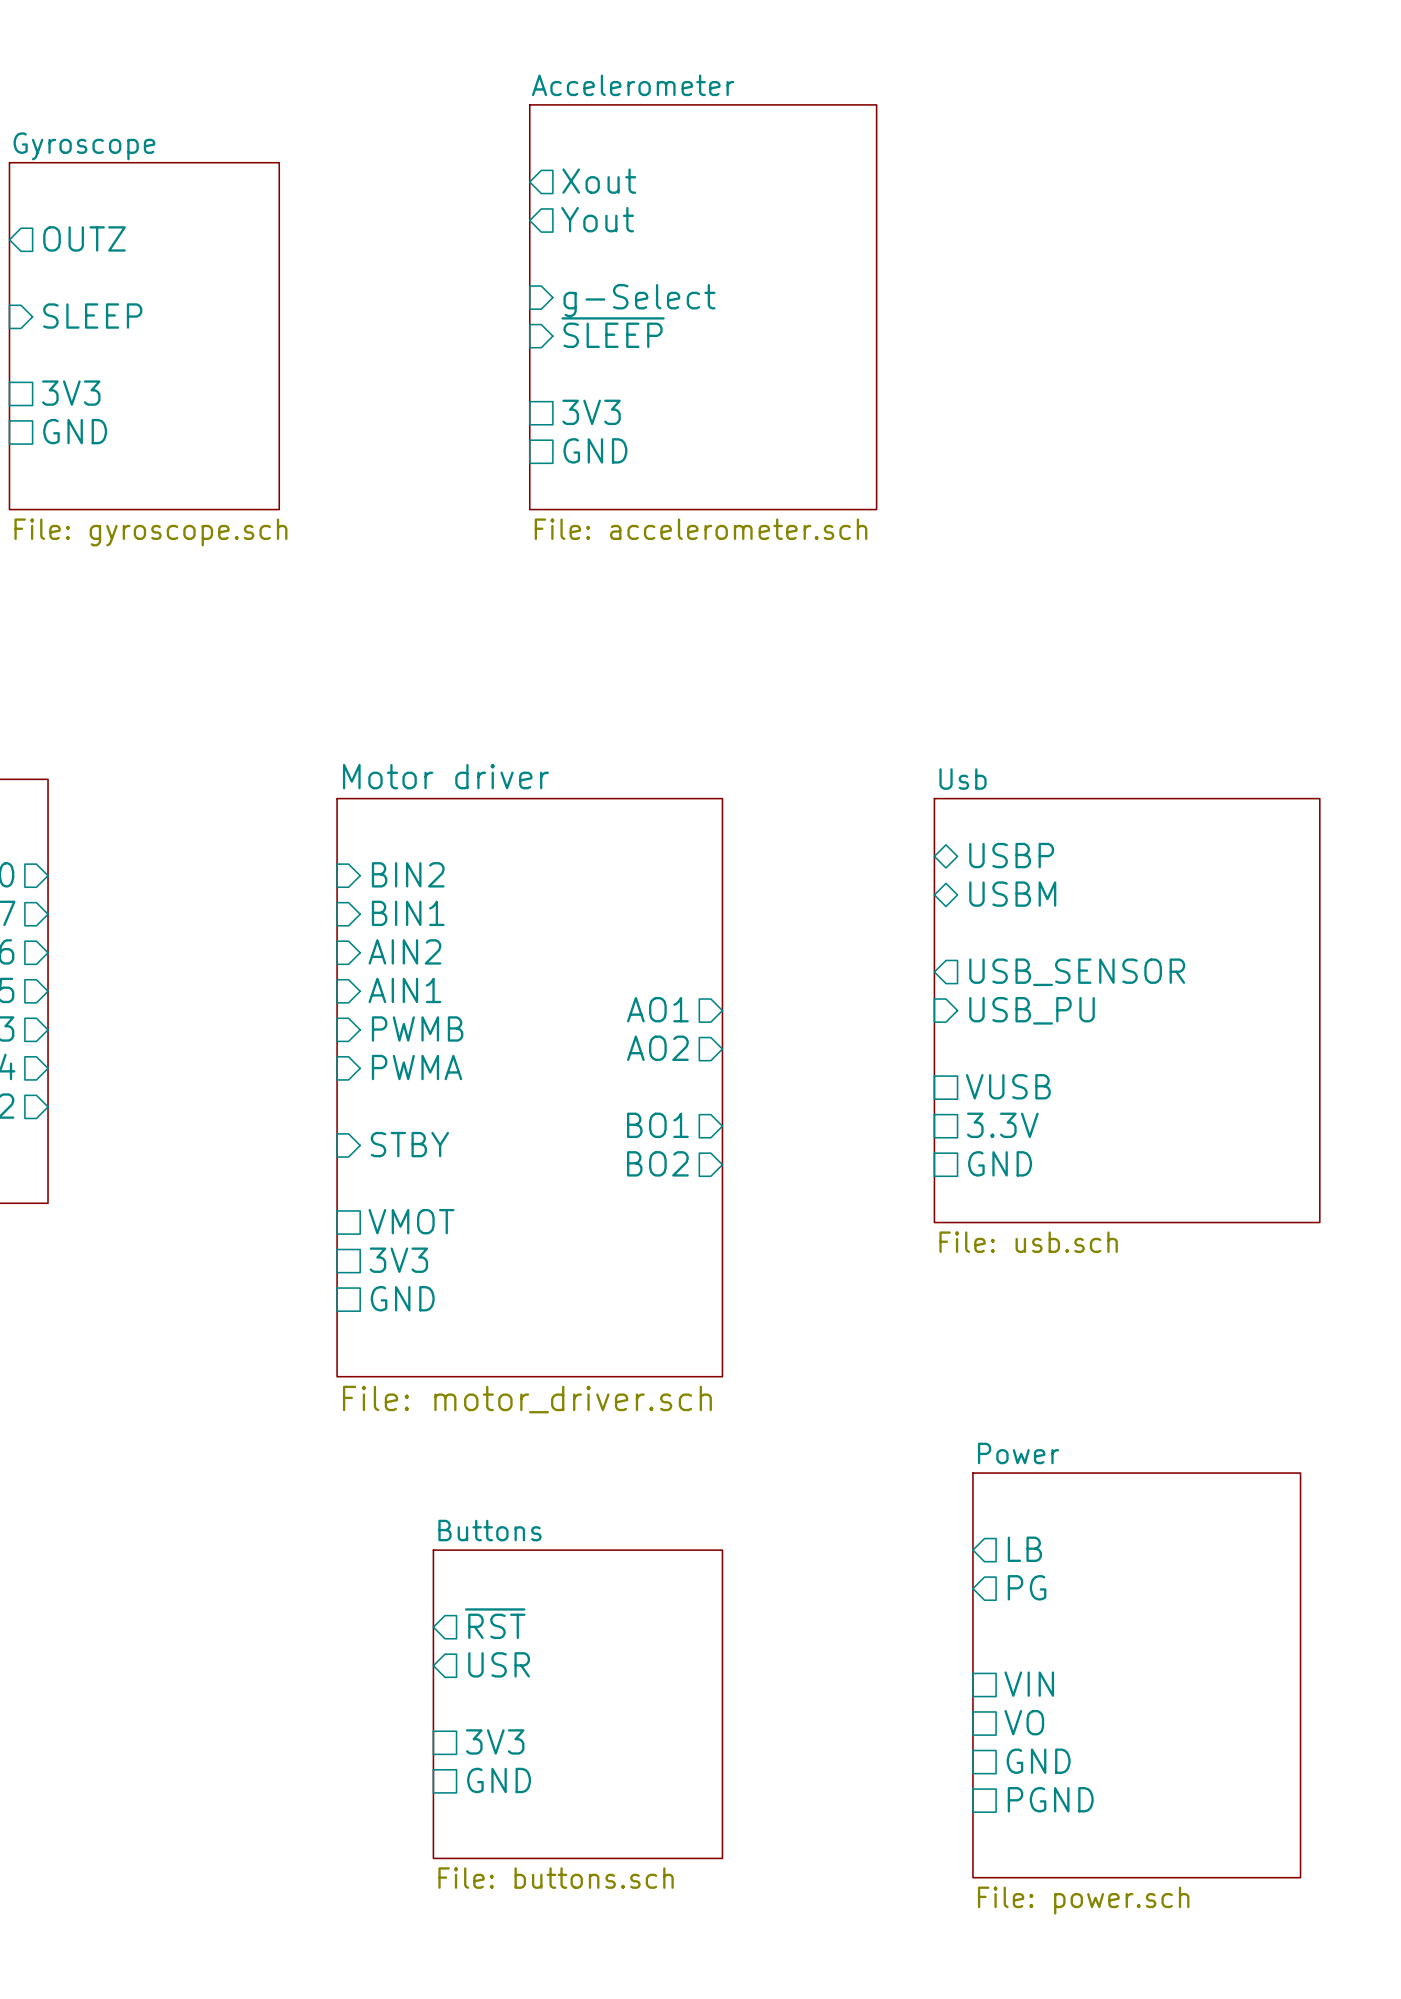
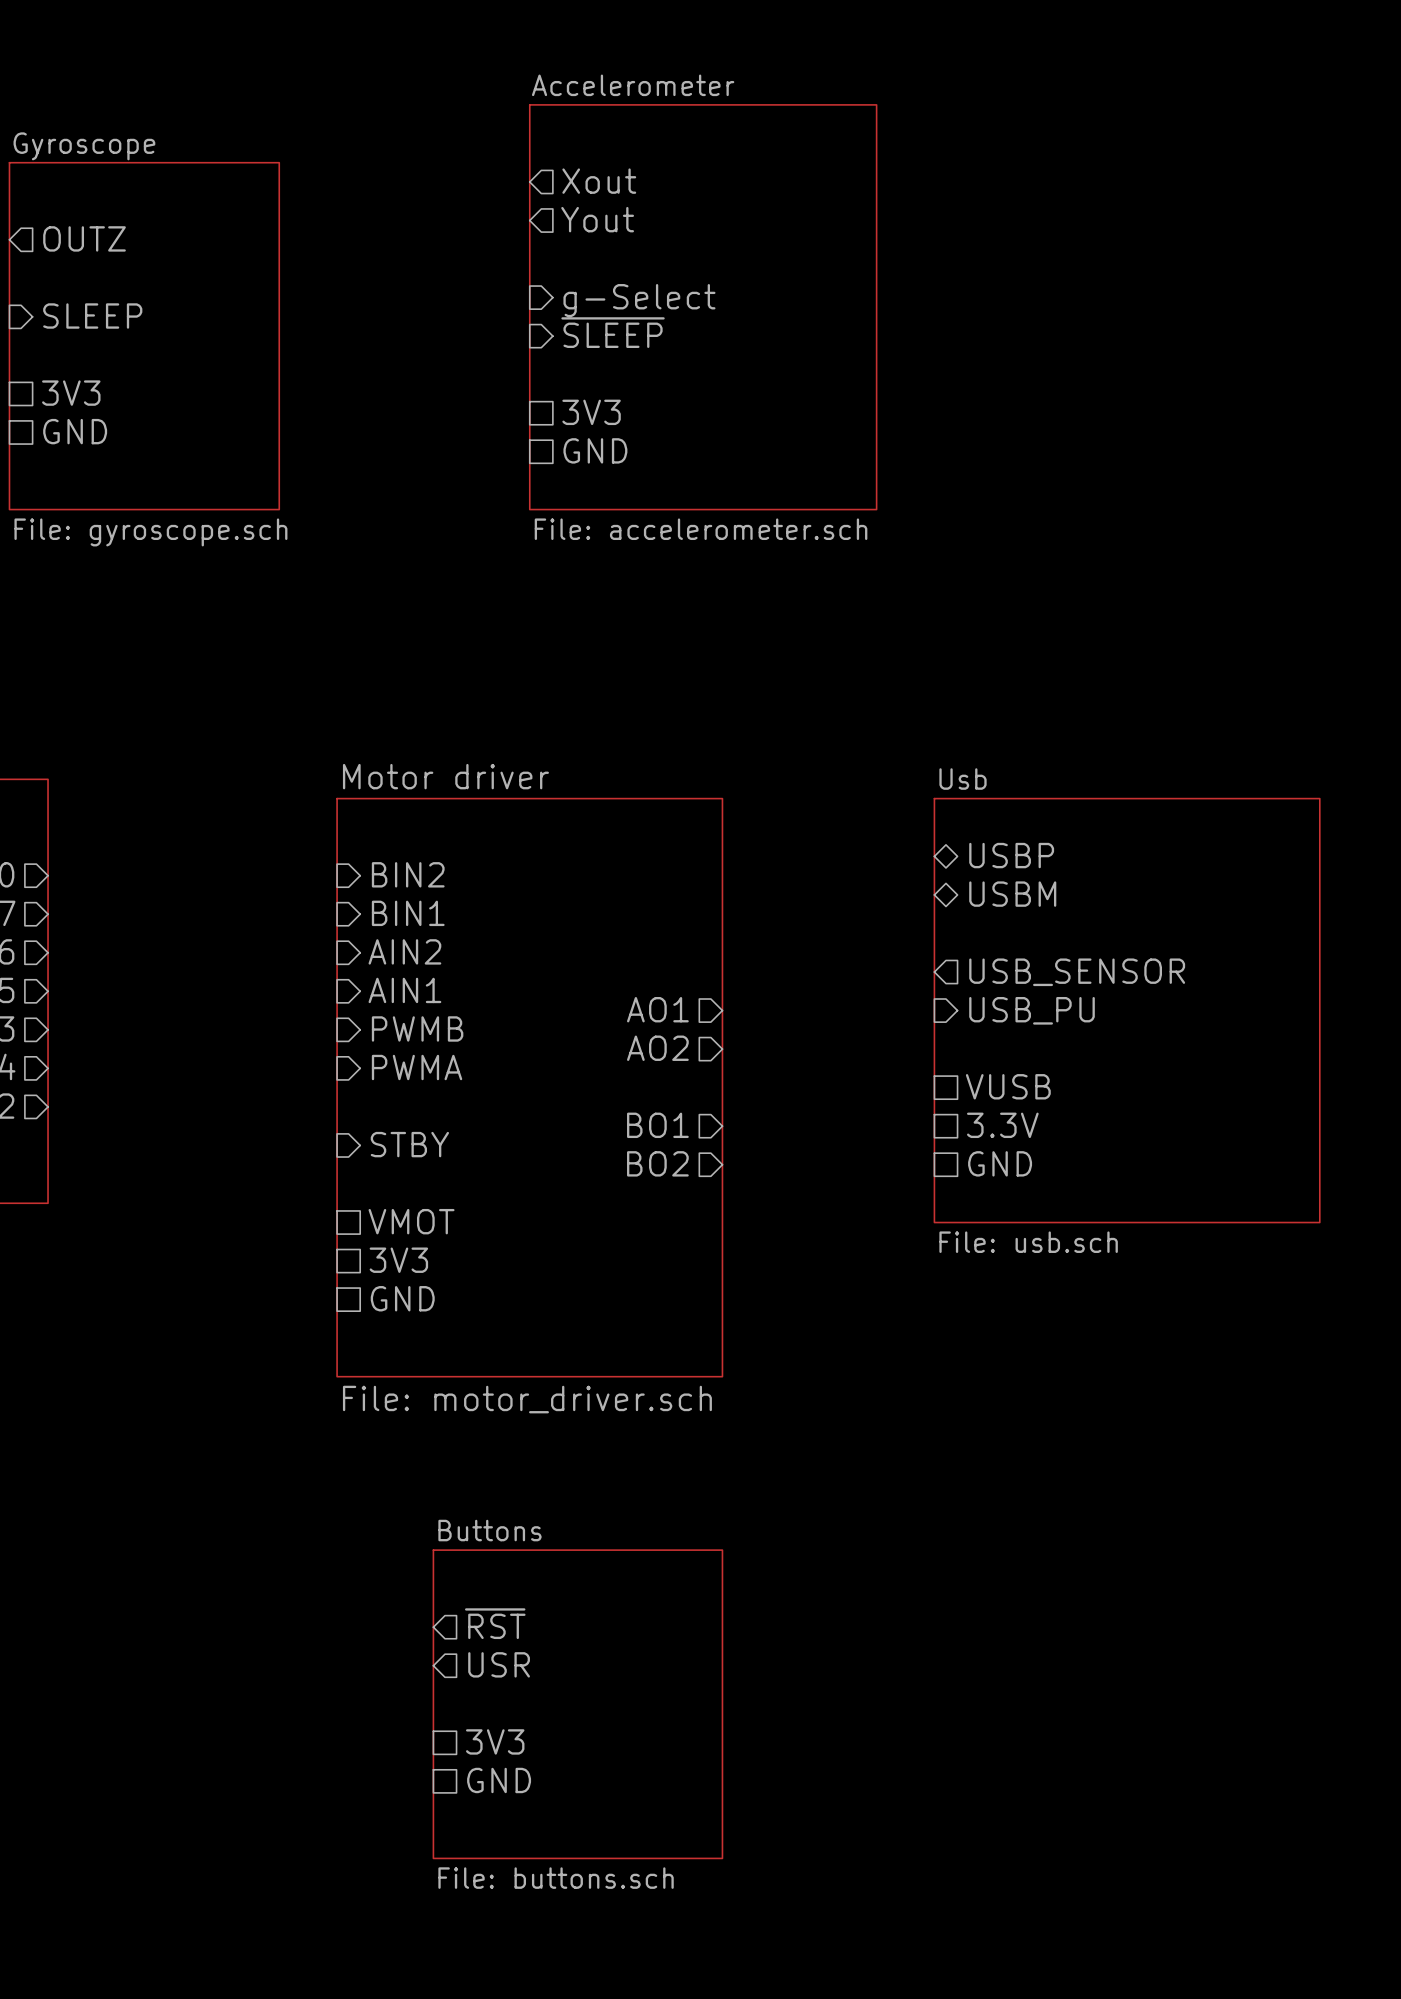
sheet pin: LB (1024, 1549) -> none
sheet pin: PG (1027, 1587) -> none
sheet Power: File: power.sch (1136, 1675) -> none
sheet pin: VIN (1029, 1684) -> none
sheet pin: VO (1024, 1722) -> none
sheet pin: GND (1038, 1761) -> none
sheet pin: PGND (1050, 1799) -> none

